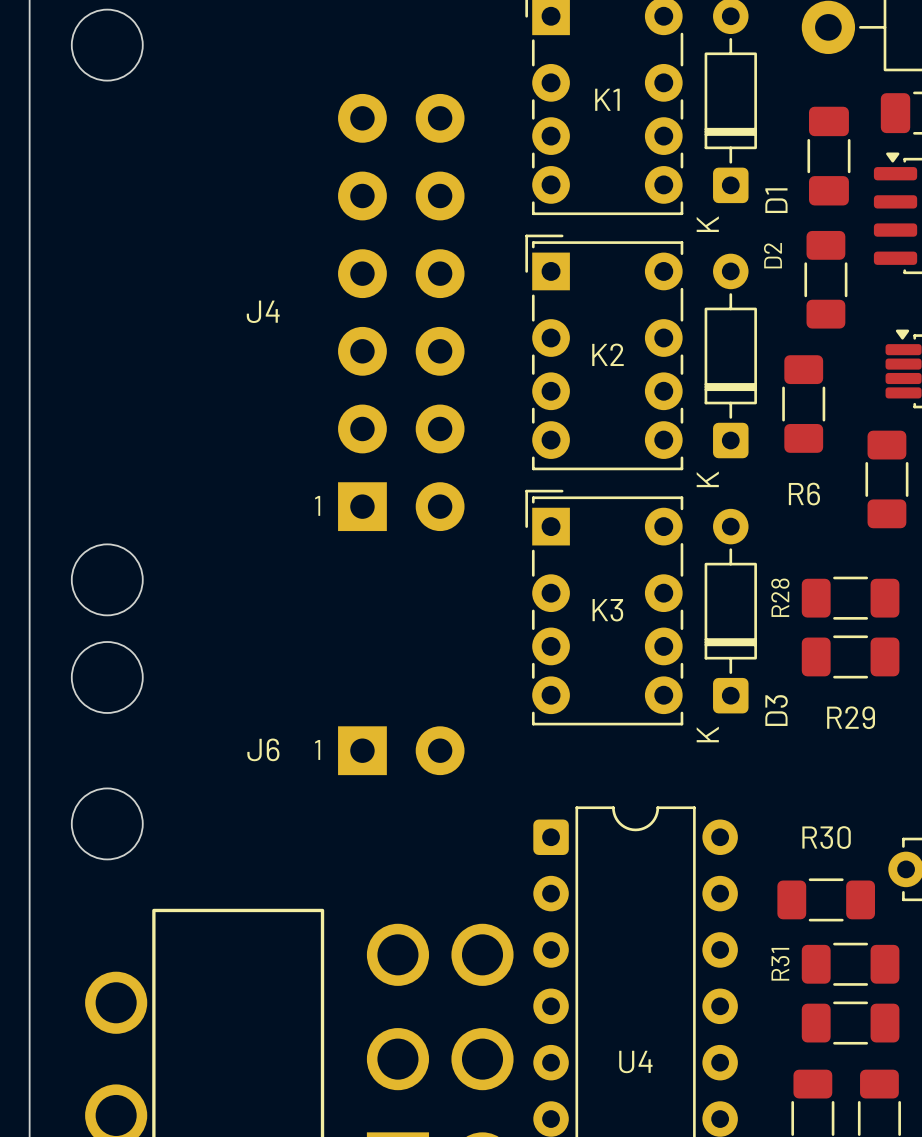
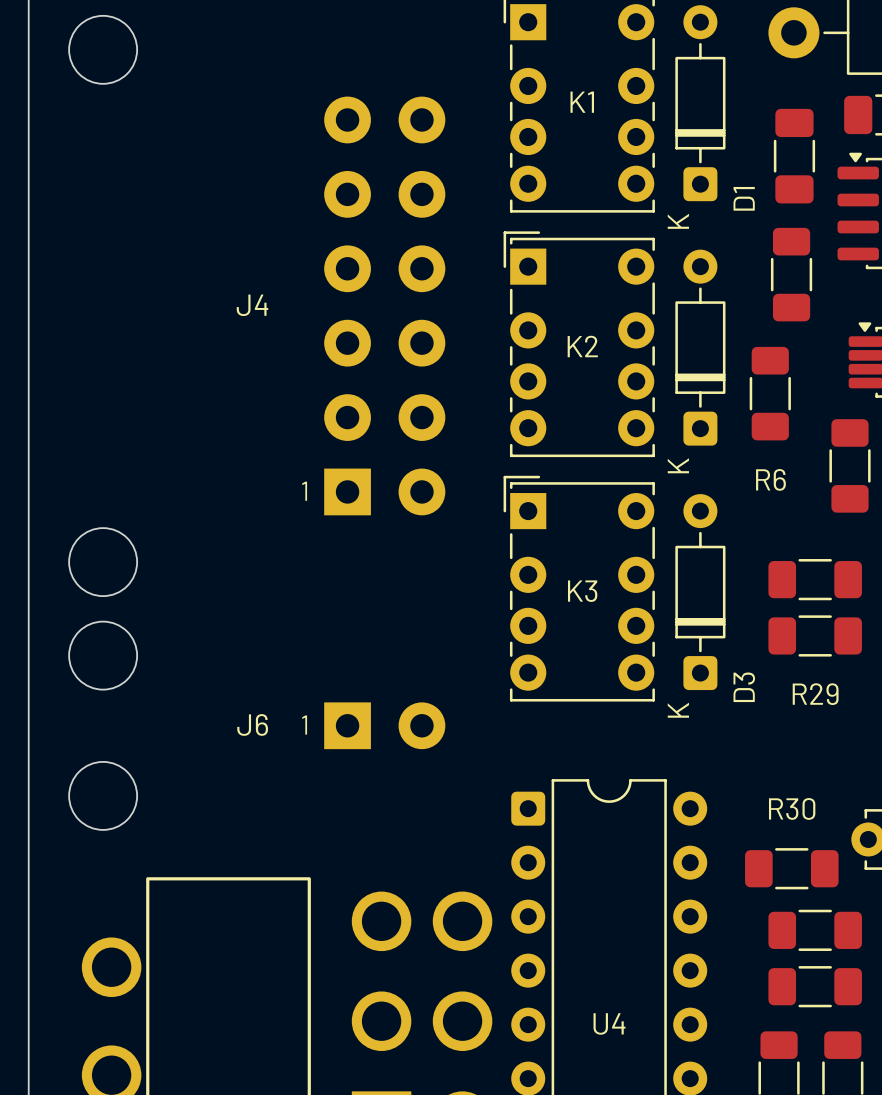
D2 name: D2 (772, 255) -> none
R28 name: R28 (780, 597) -> none
R31 name: R31 (780, 964) -> none

